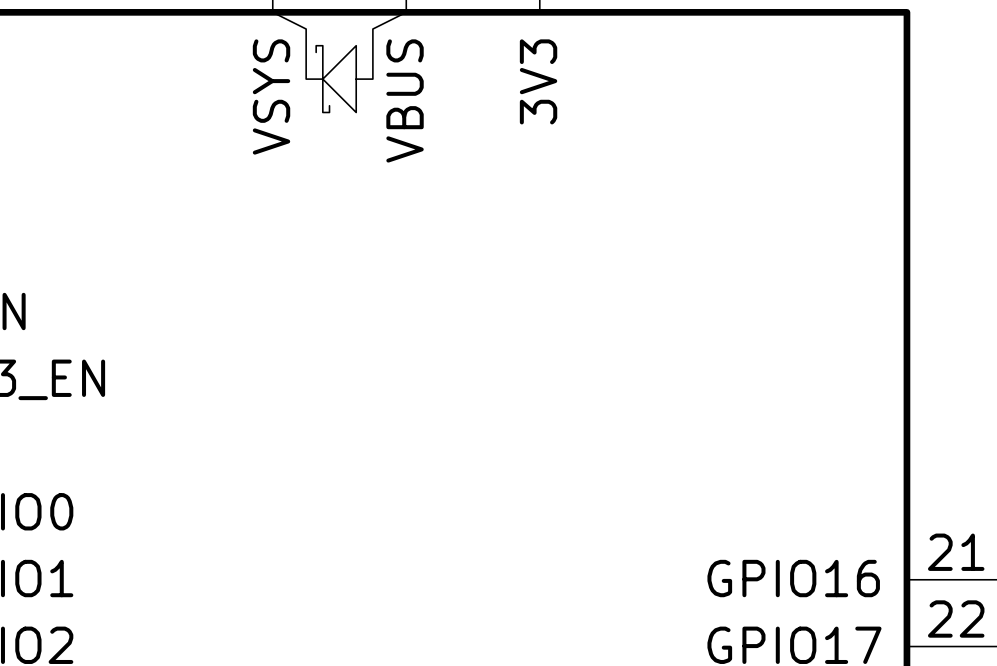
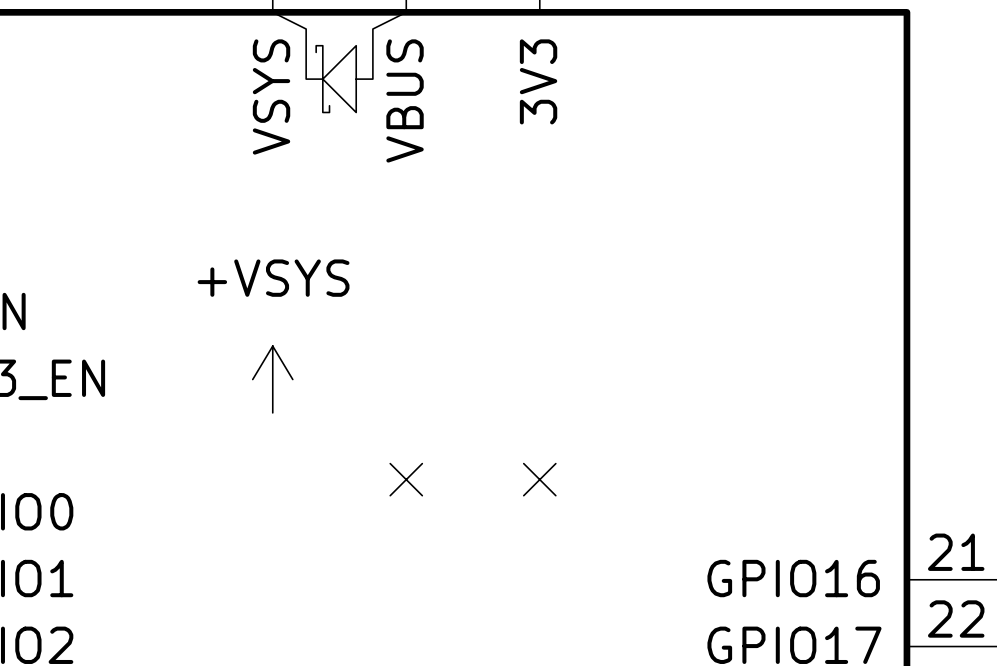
power symbol: none -> +VSYS (272, 379)
no-connect mark: none -> (406, 479)
no-connect mark: none -> (539, 479)

